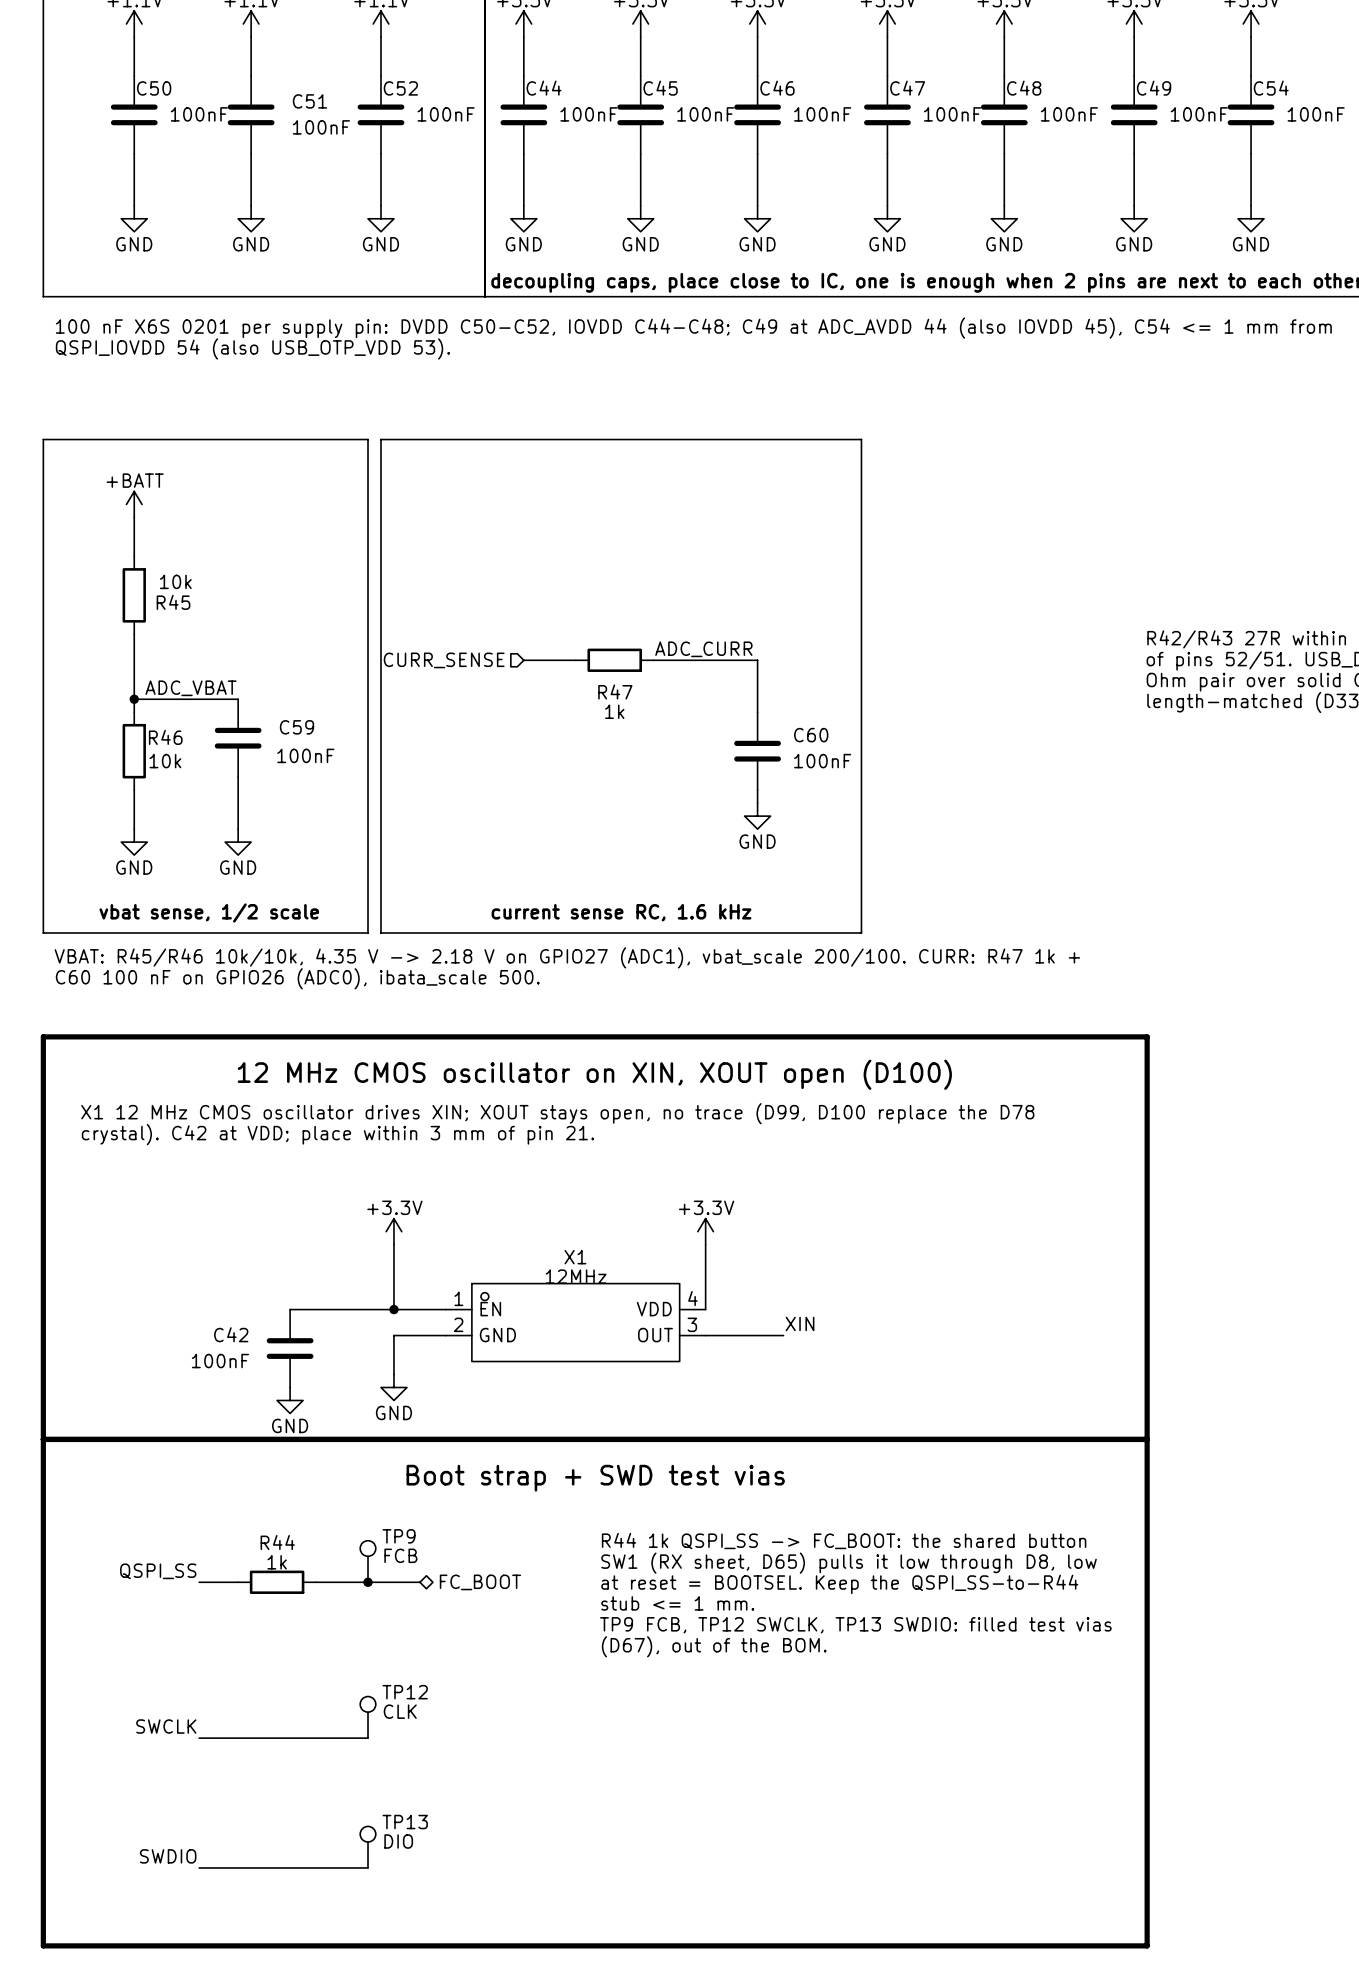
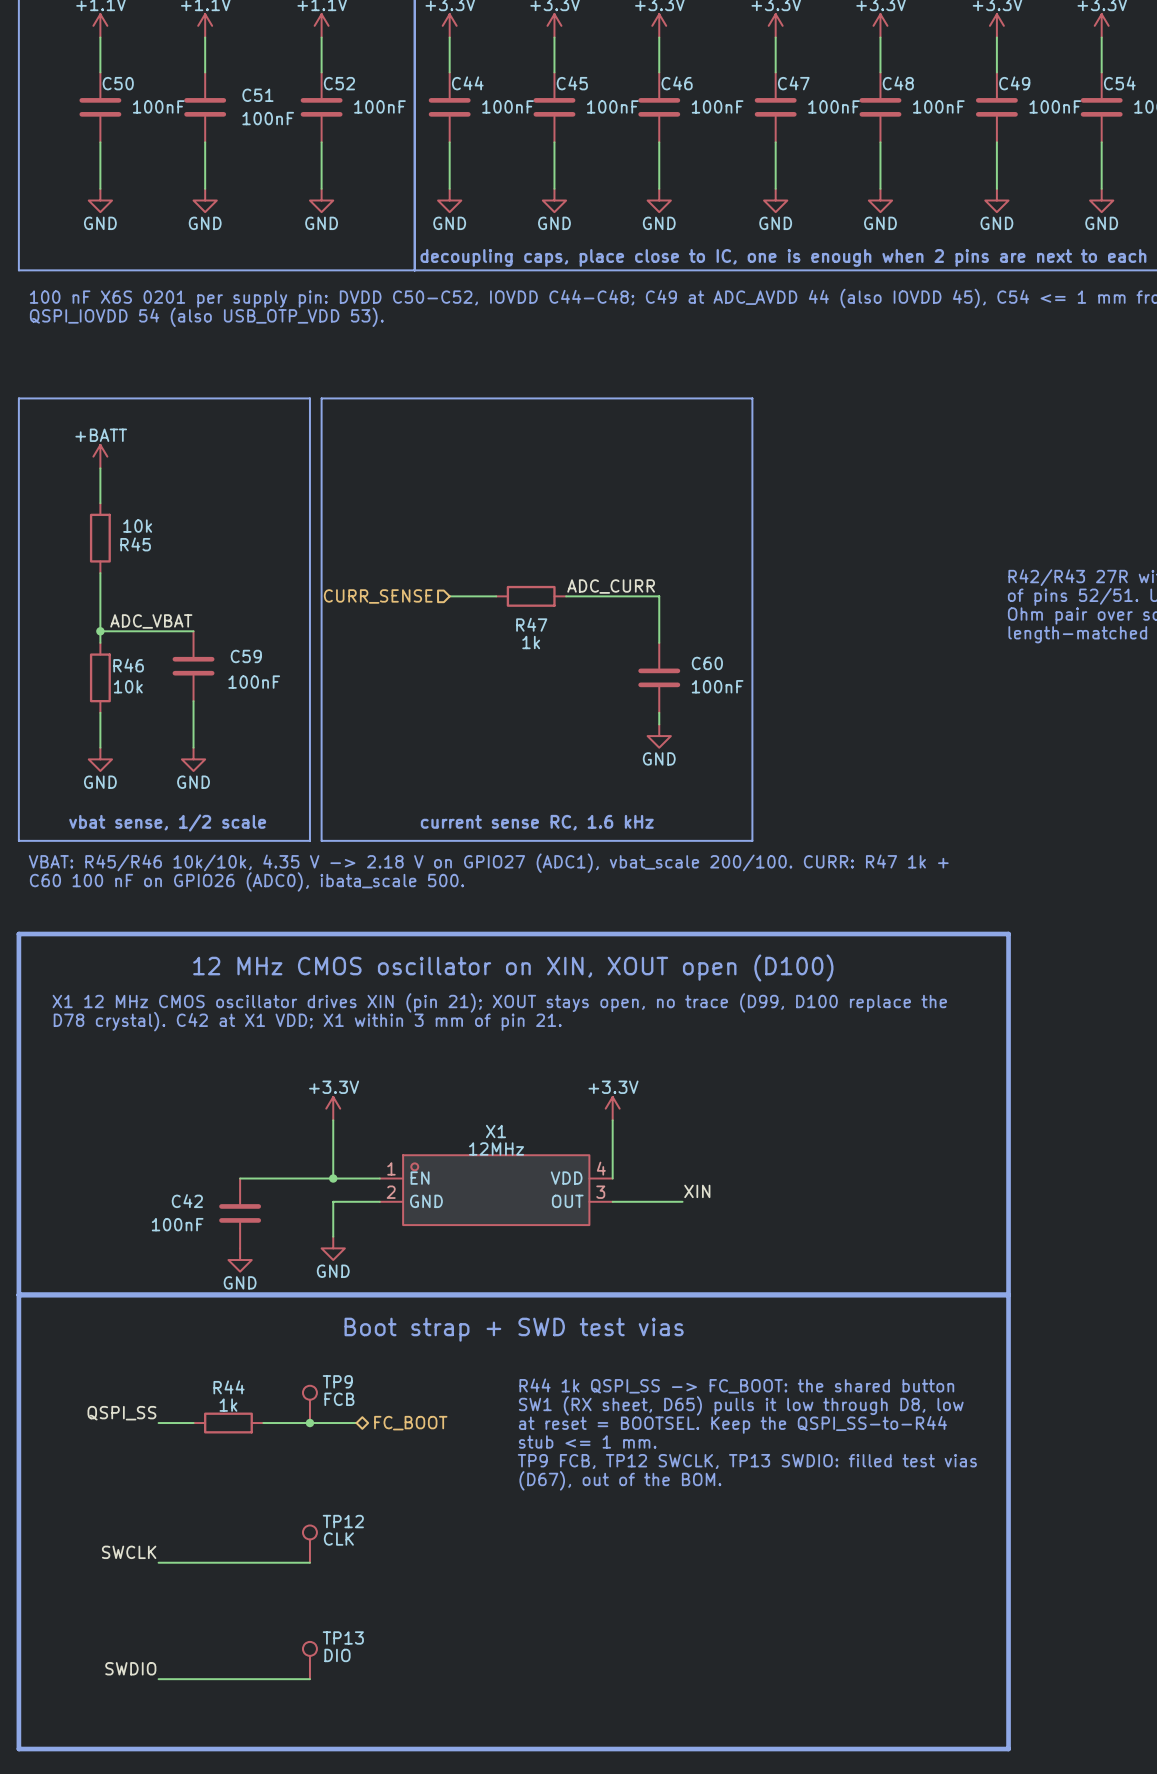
text: X1 12 MHz CMOS oscillator drives XIN; XOUT stays open, no trace (D99, D100 replace the D78 (557, 1113) -> X1 12 MHz CMOS oscillator drives XIN (pin 21); XOUT stays open, no trace (D99, D100 replace the (499, 1002)
text: crystal). C42 at VDD; place within 3 mm of pin 21. (337, 1134) -> D78 crystal). C42 at X1 VDD; X1 within 3 mm of pin 21. (307, 1021)

